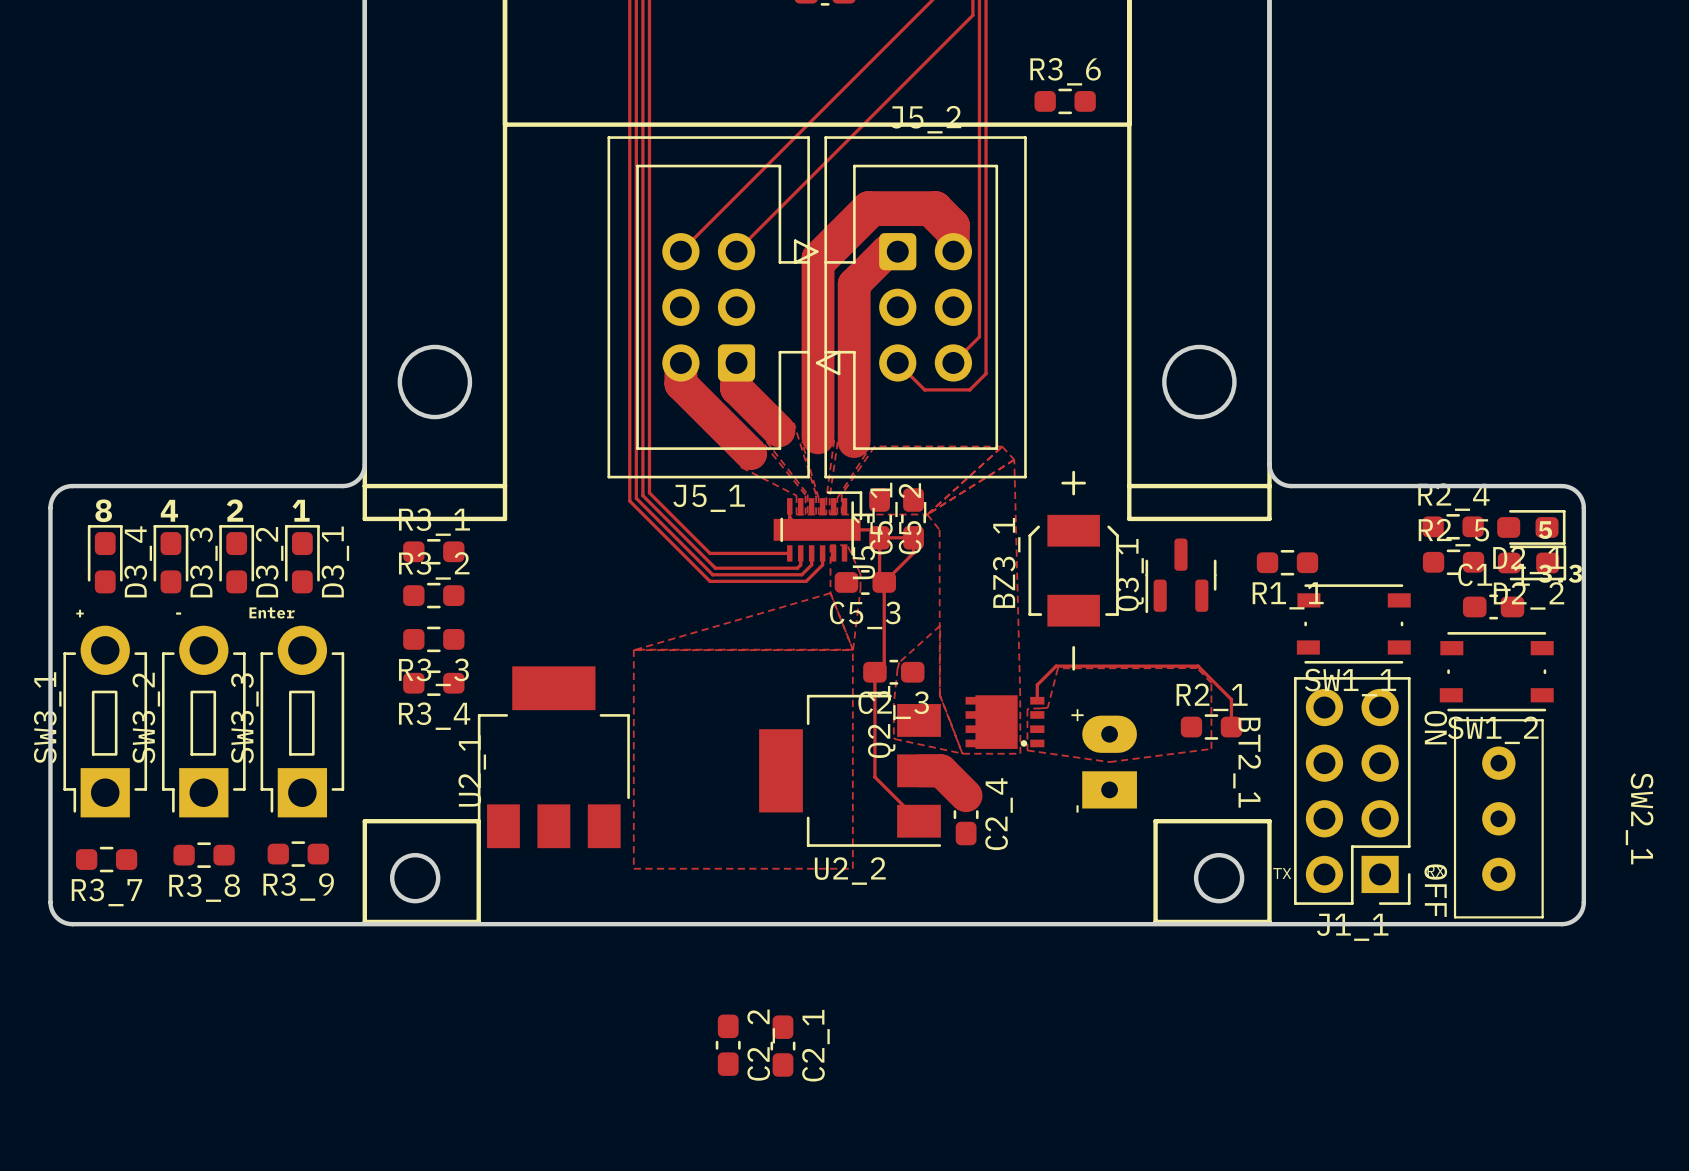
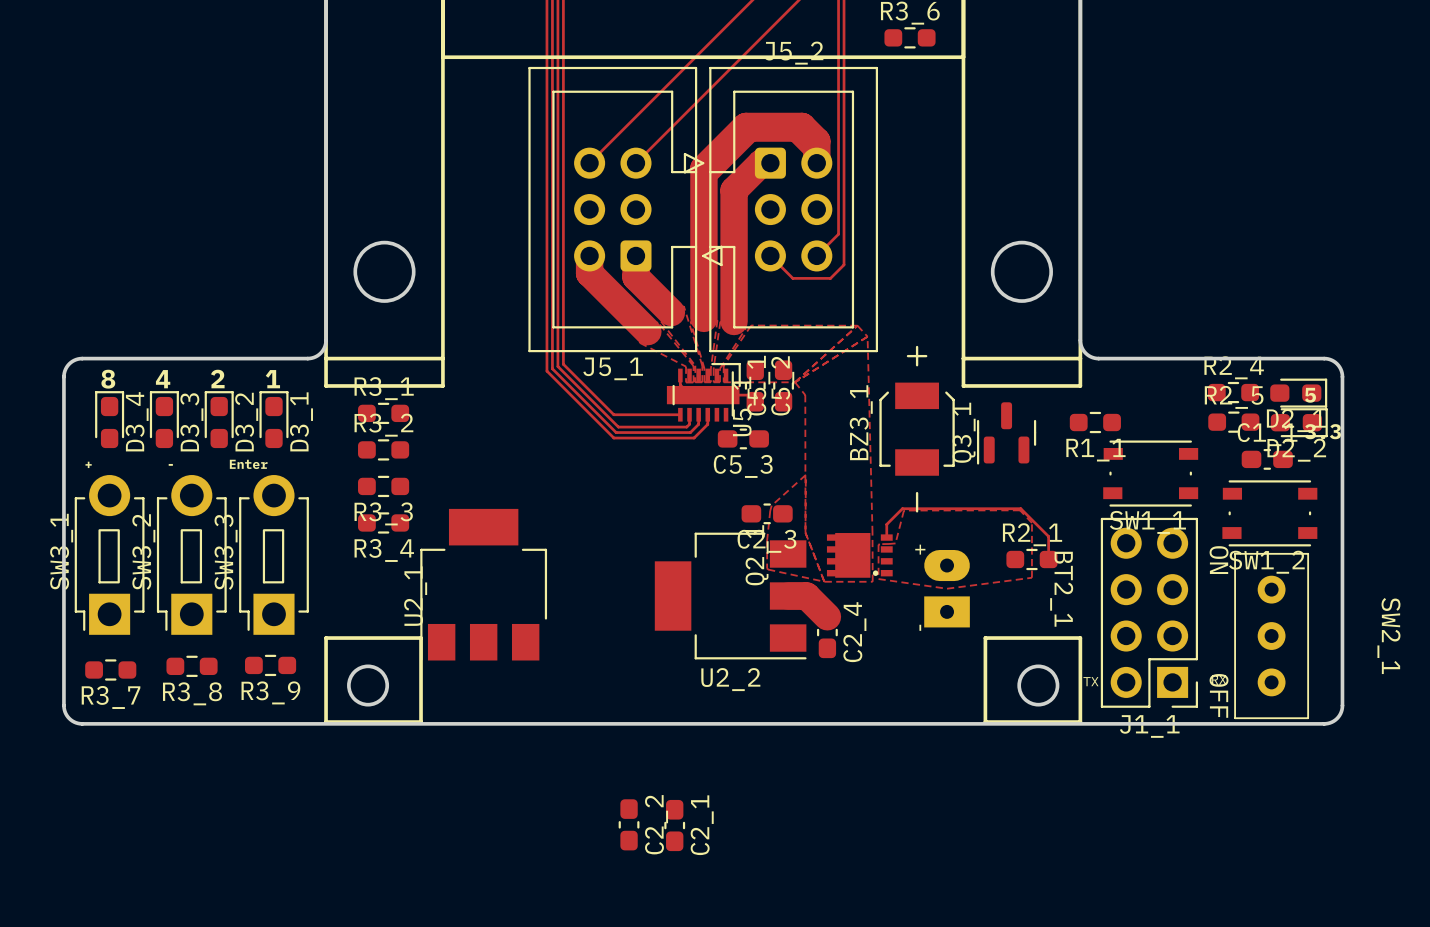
track: (884, 582) (879, 577) (879, 537) (913, 537) (913, 553) (884, 582) -> none
track: (884, 582) (884, 662) (874, 672) (874, 777) (919, 821) -> none
zone outline: (830, 593) (853, 650) -> none
zone outline: (830, 593) (634, 650) (853, 650) -> none
zone outline: (830, 593) (830, 545) (847, 545) (860, 574) (853, 650) -> none
zone outline: (633, 649) (633, 868) (852, 868) (852, 649) (633, 649) -> none

